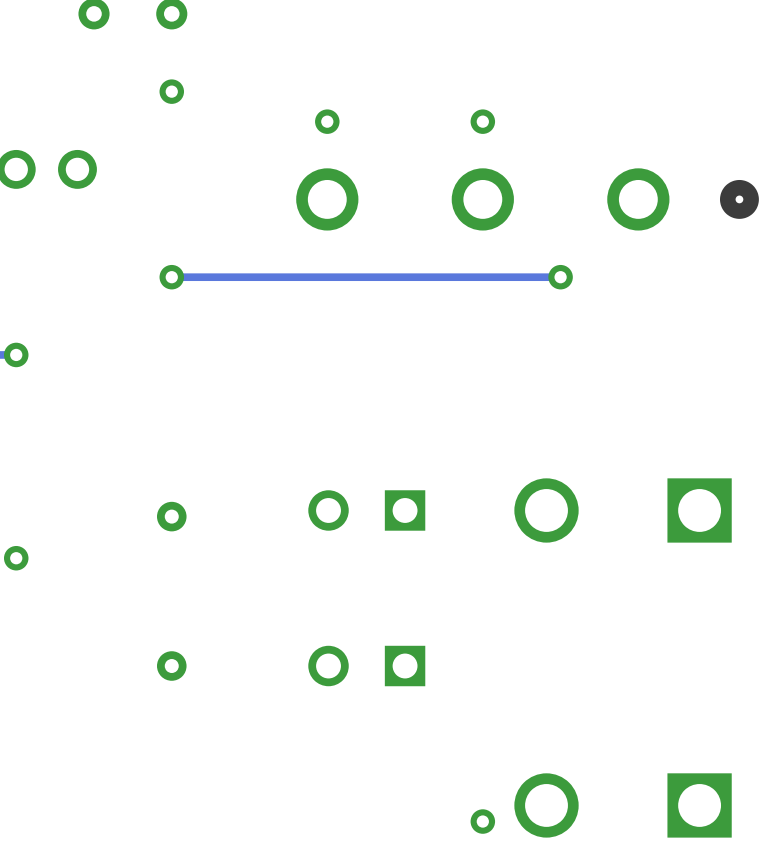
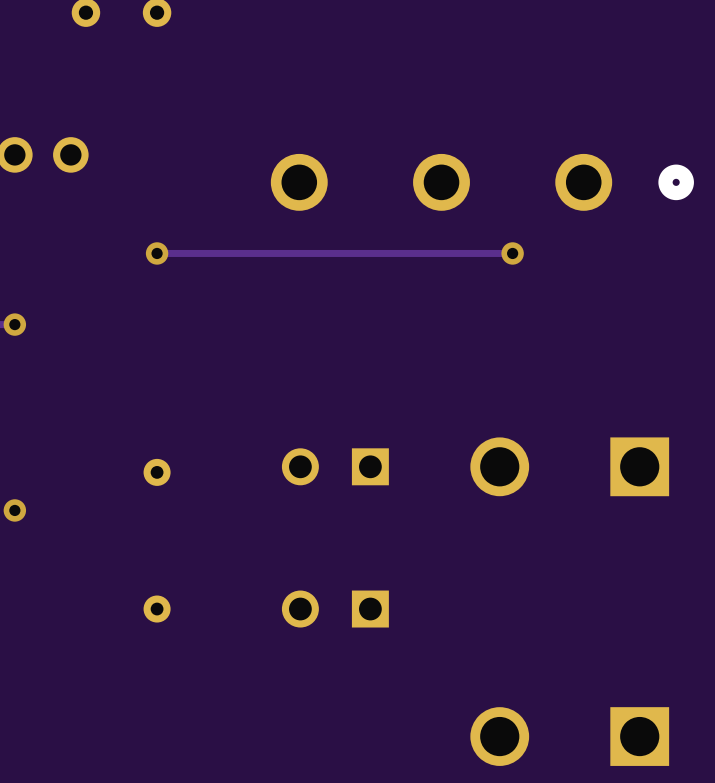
via: (171, 91) -> none
via: (327, 121) -> none
via: (482, 121) -> none
via: (482, 821) -> none

